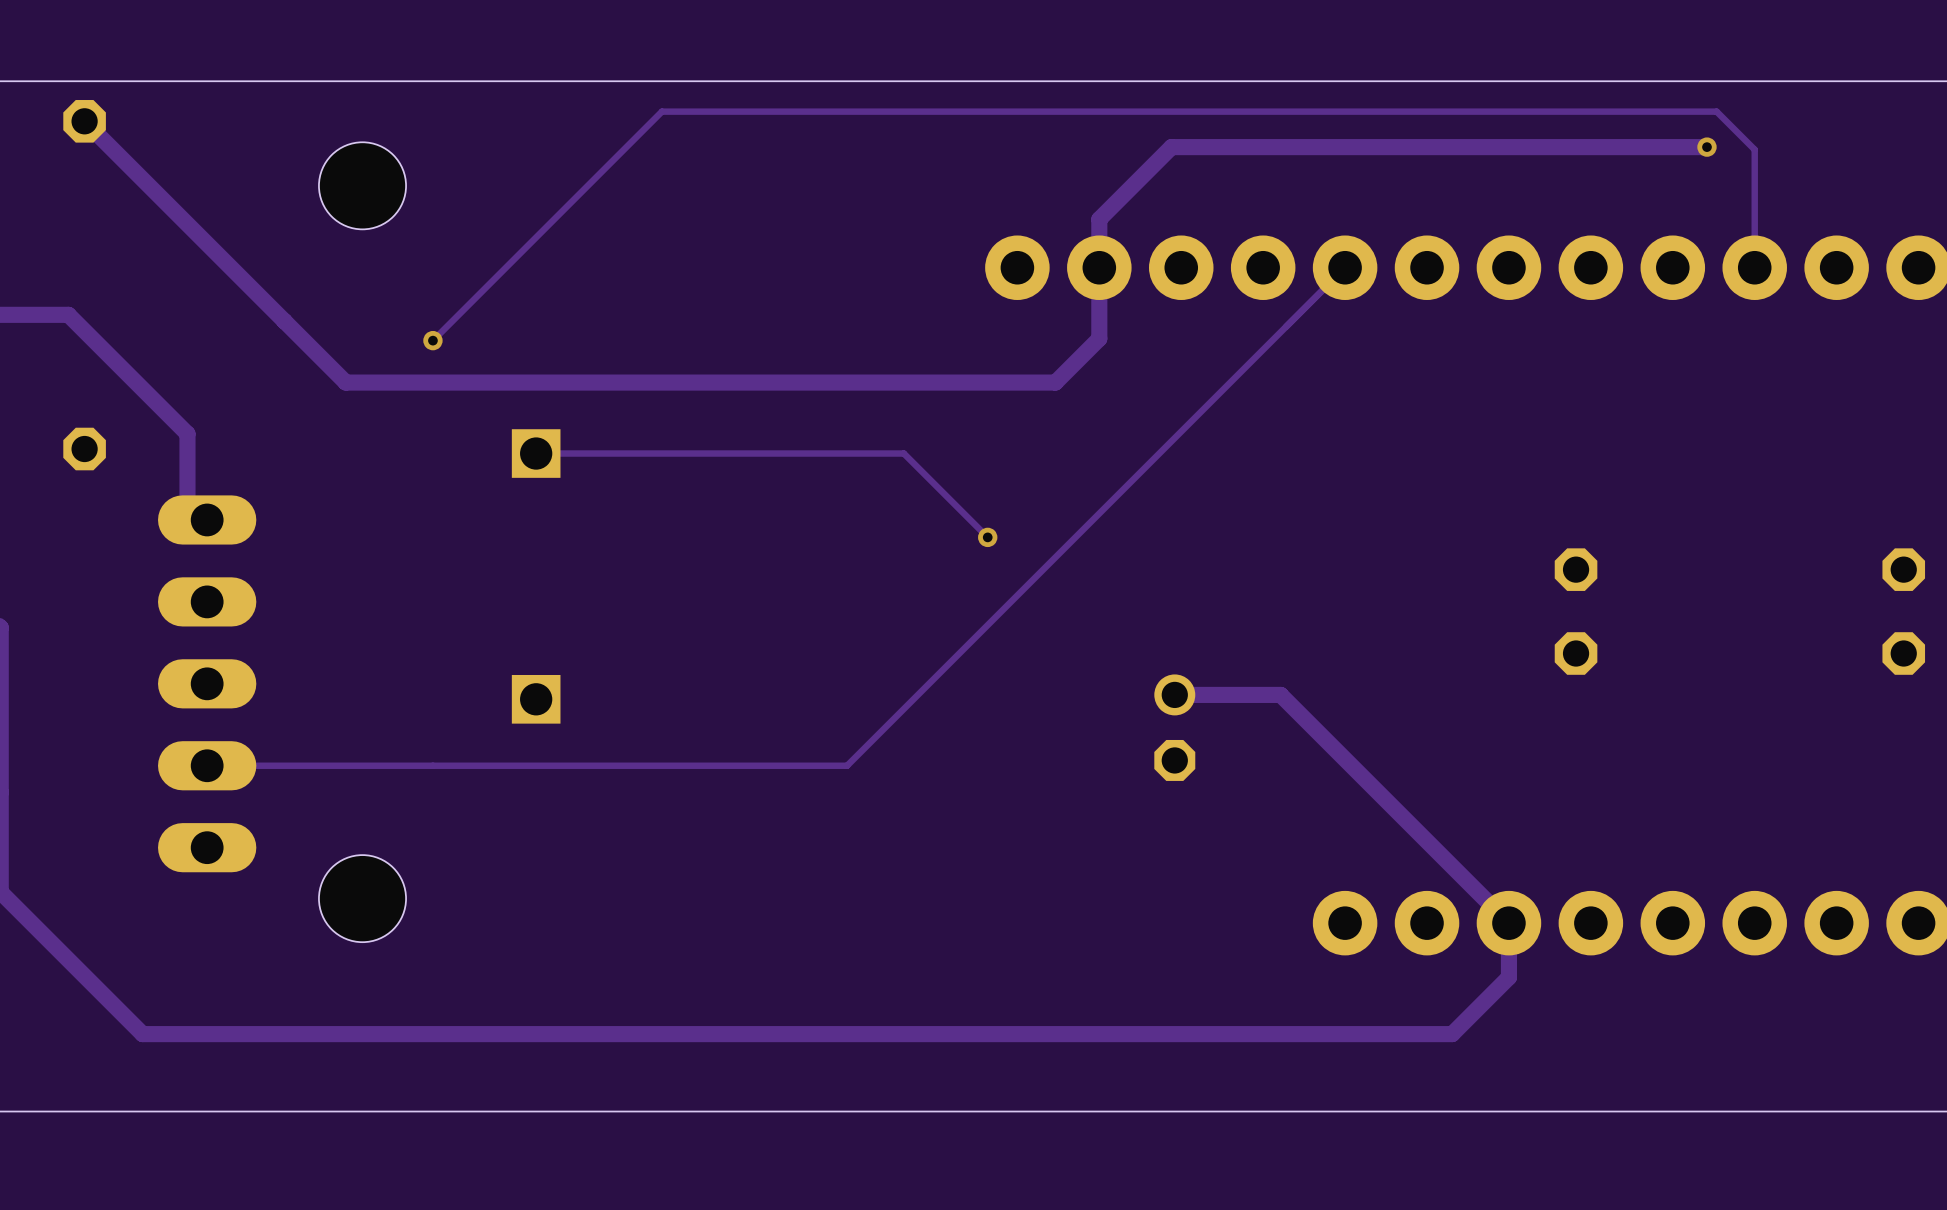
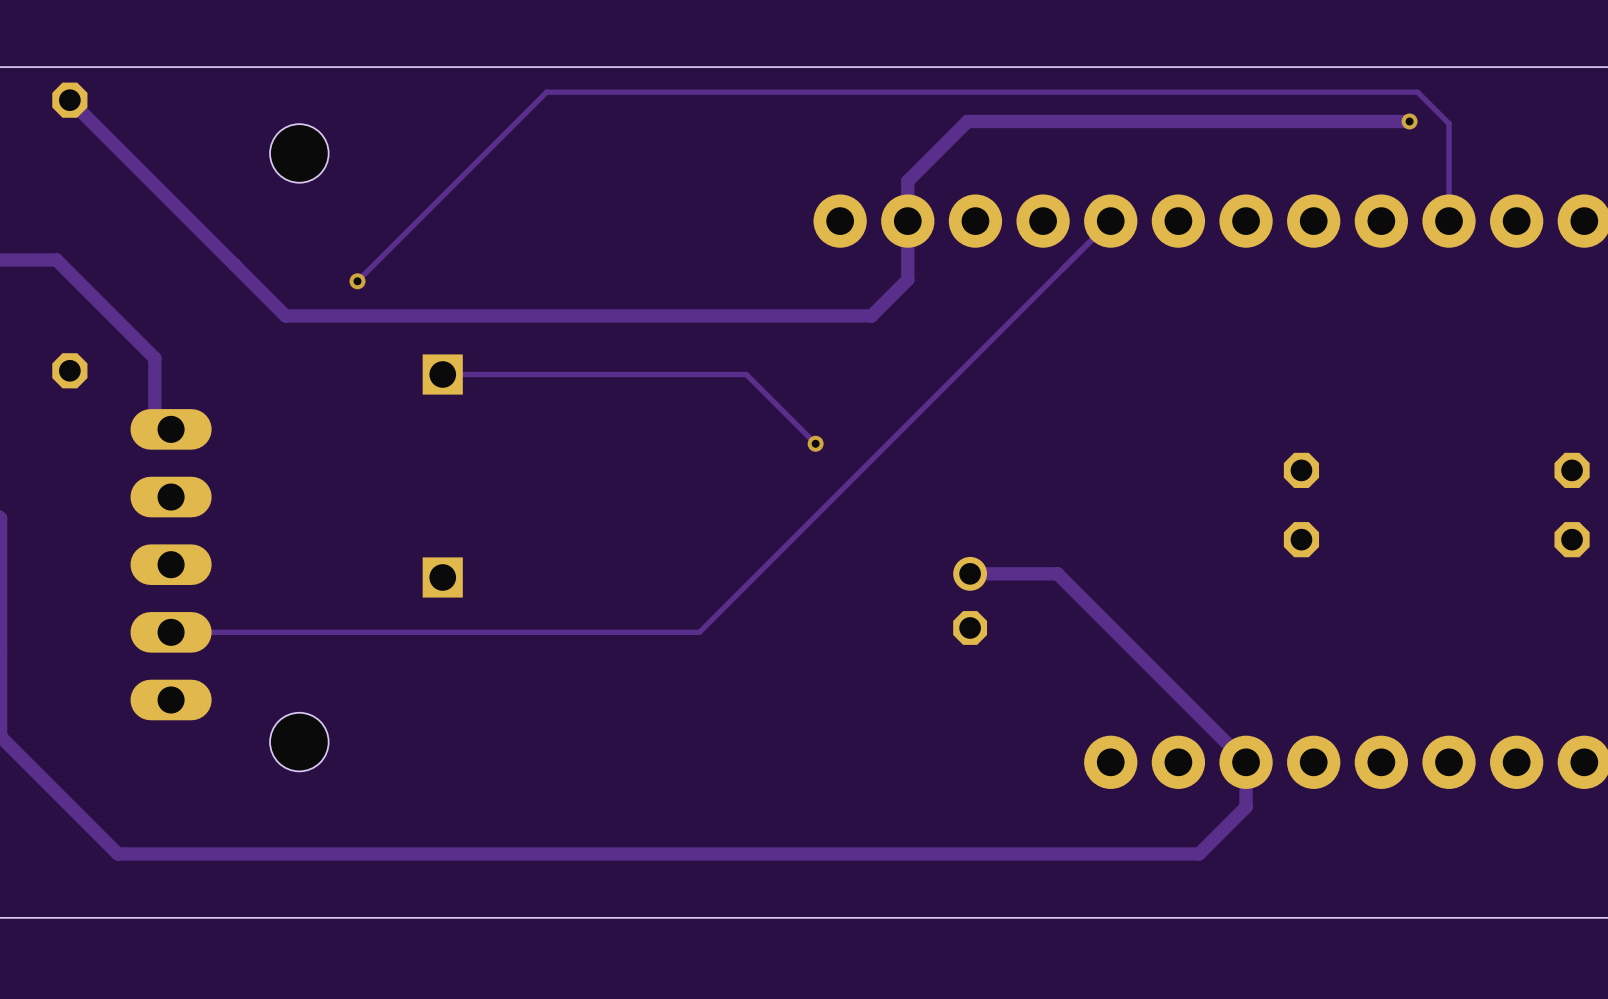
part footprint: [318, 142, 407, 230] -> [270, 124, 329, 183]
part footprint: [318, 855, 407, 943] -> [270, 712, 329, 772]

